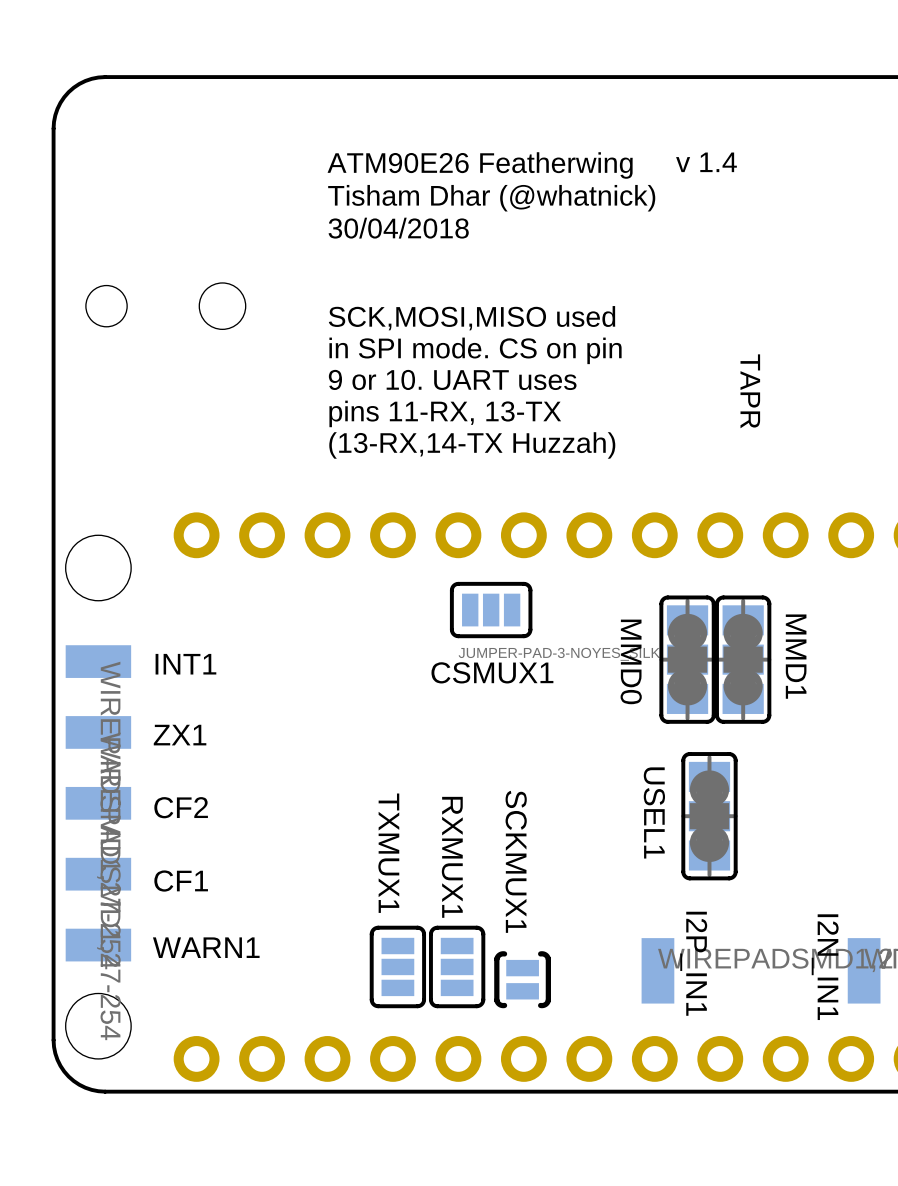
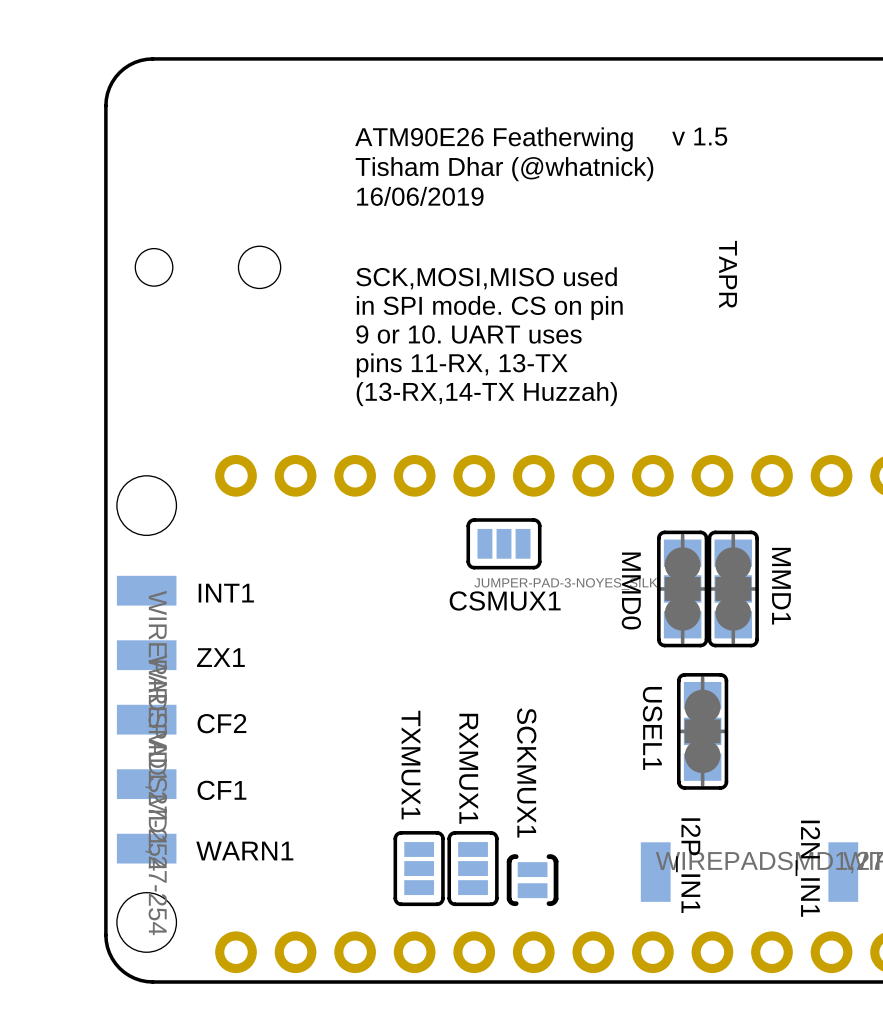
text: v 1.4 (706, 162) -> v 1.5 (699, 136)
text: 30/04/2018 (398, 228) -> 16/06/2019 (420, 196)
text position: TAPR (750, 391) -> TAPR (728, 274)

